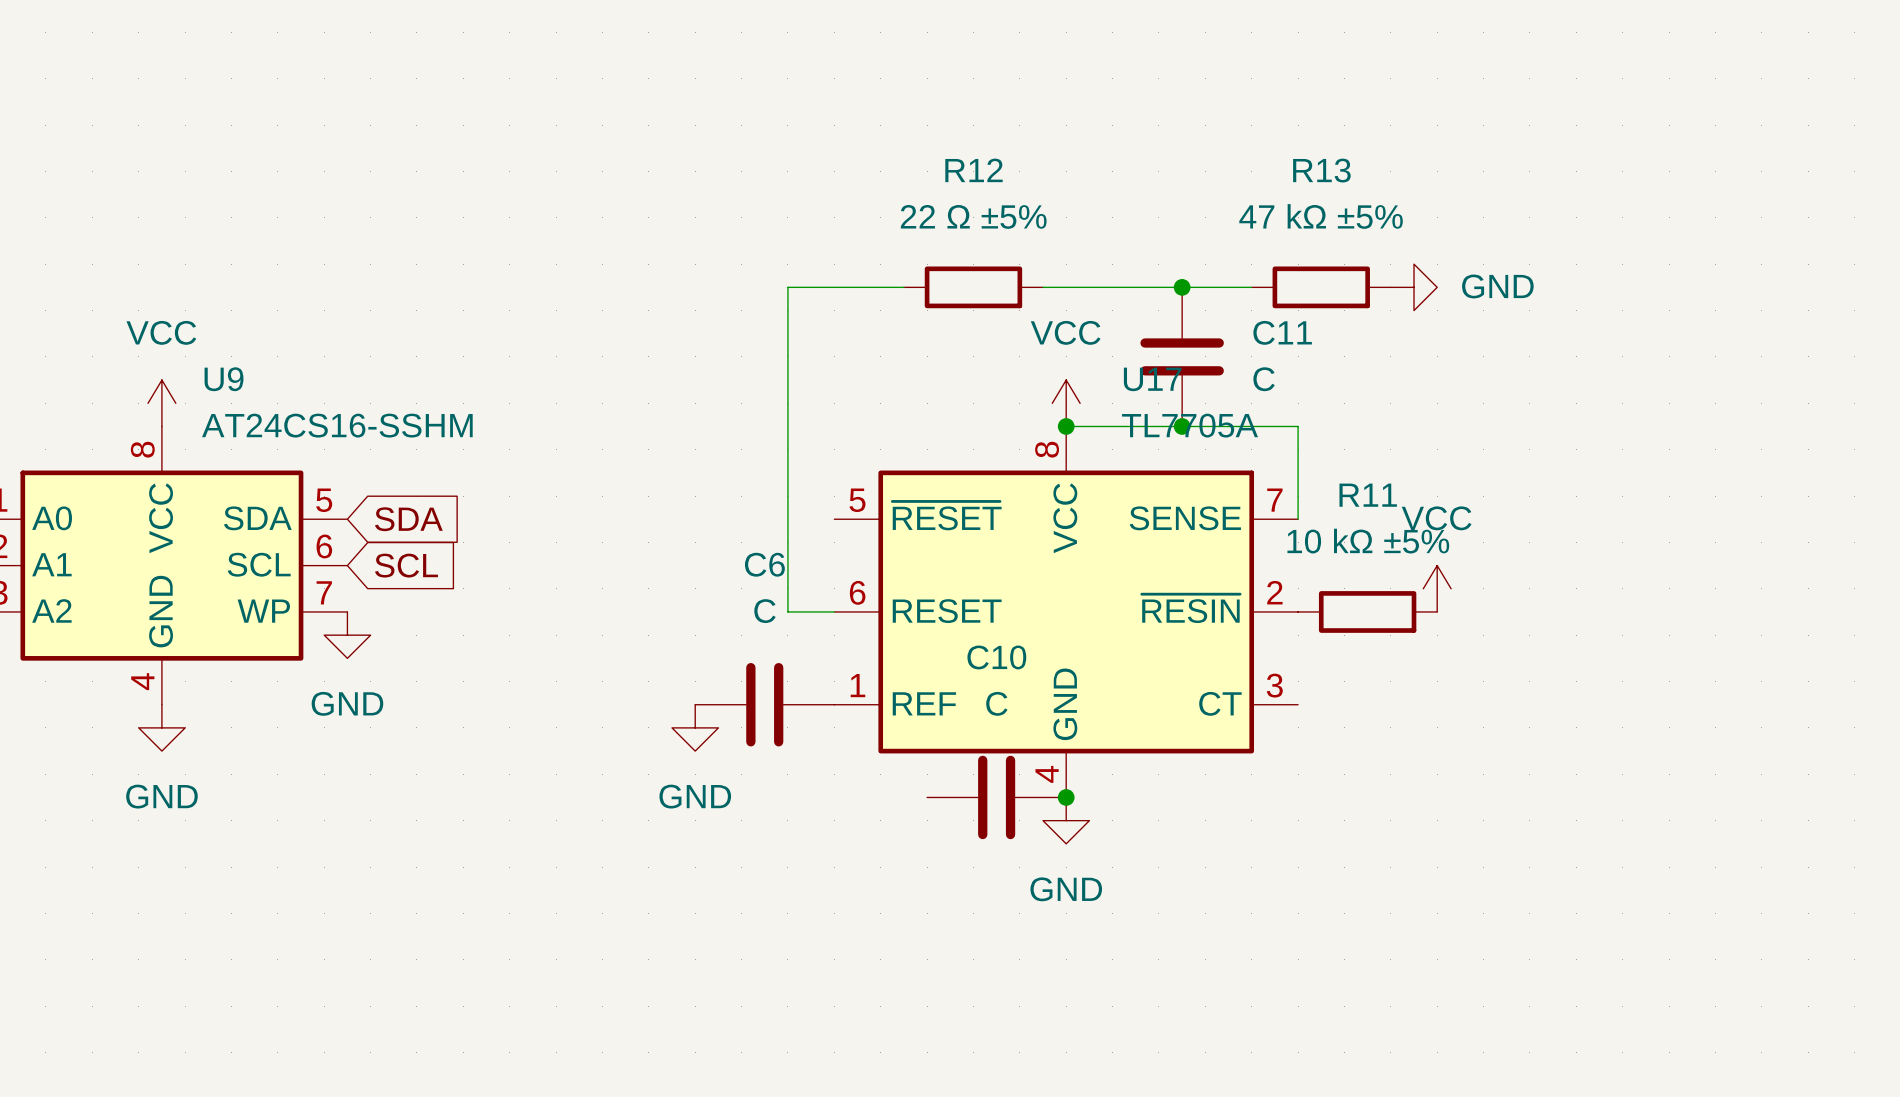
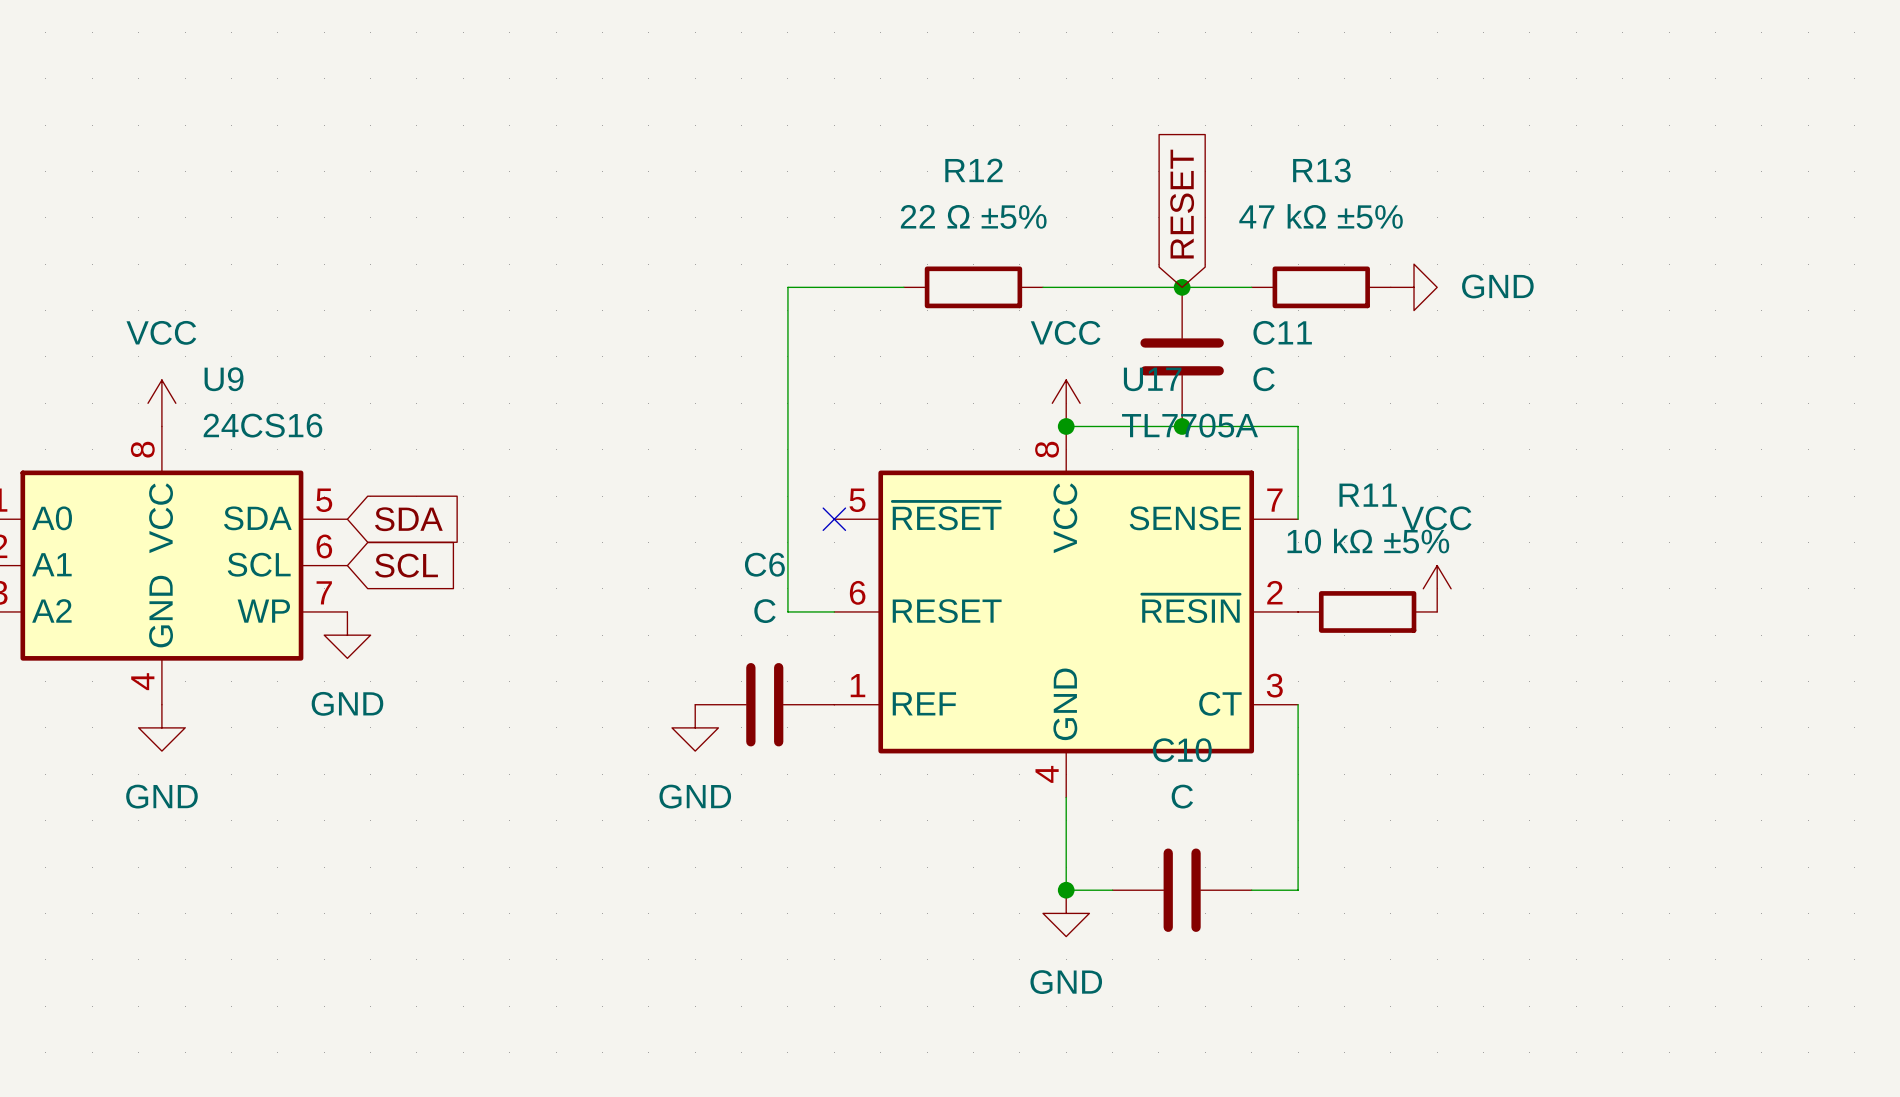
global label: none -> RESET (1182, 204)
U9 value: AT24CS16-SSHM (337, 425) -> 24CS16 (262, 425)
no-connect mark: none -> (834, 519)
wire: none -> (1298, 704) (1298, 890) (1251, 890)
C10 position: (996, 797) -> (1182, 890)
wire: none -> (1066, 797) (1066, 890) (1112, 890)
junction position: (1066, 797) -> (1066, 890)
power symbol position: GND (1066, 820) -> GND (1066, 913)

